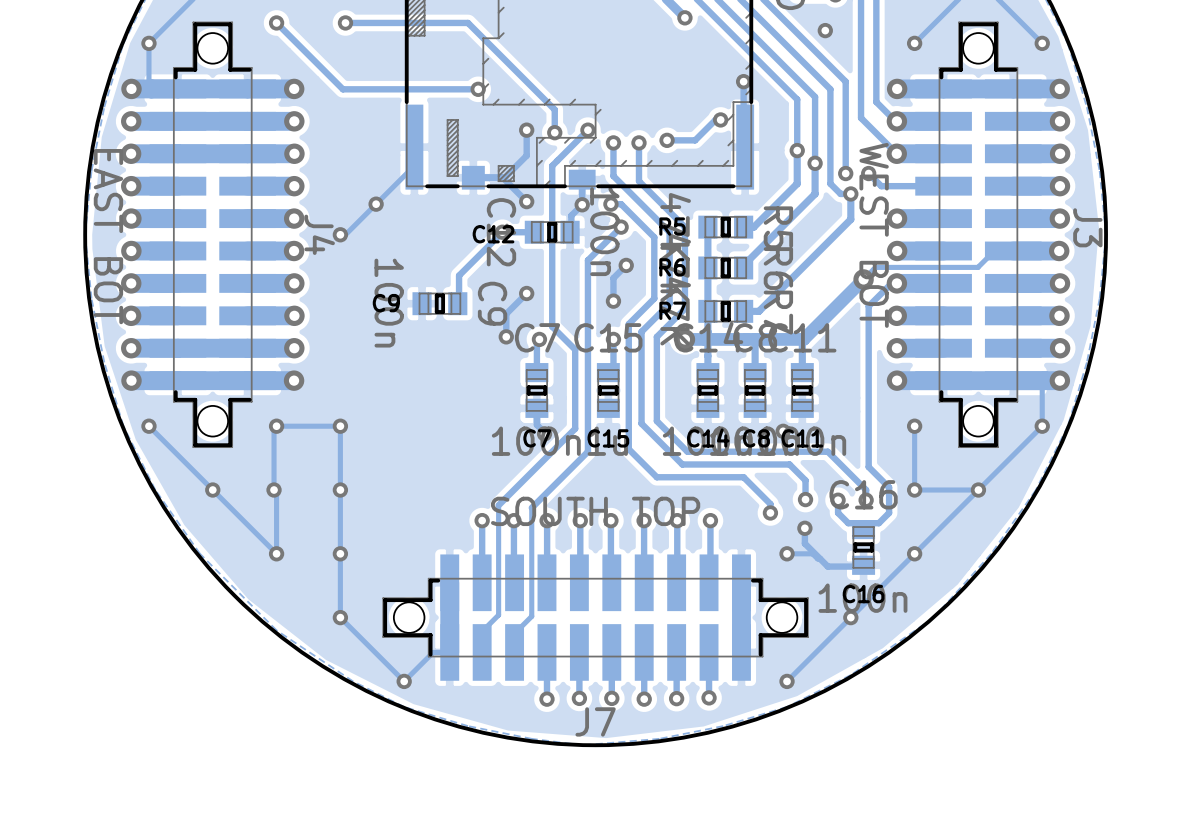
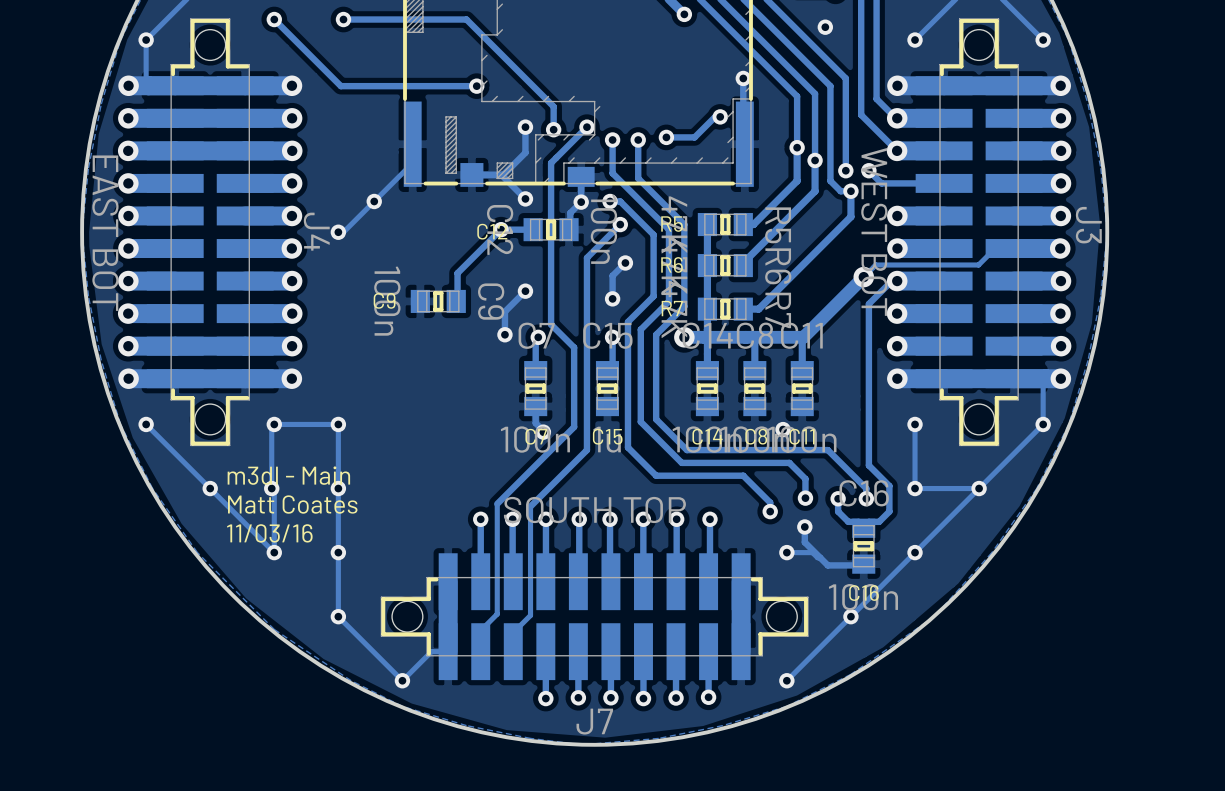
text: none -> m3dl - Main (288, 475)
text: none -> Matt Coates (292, 504)
text: none -> 11/03/16 (269, 533)

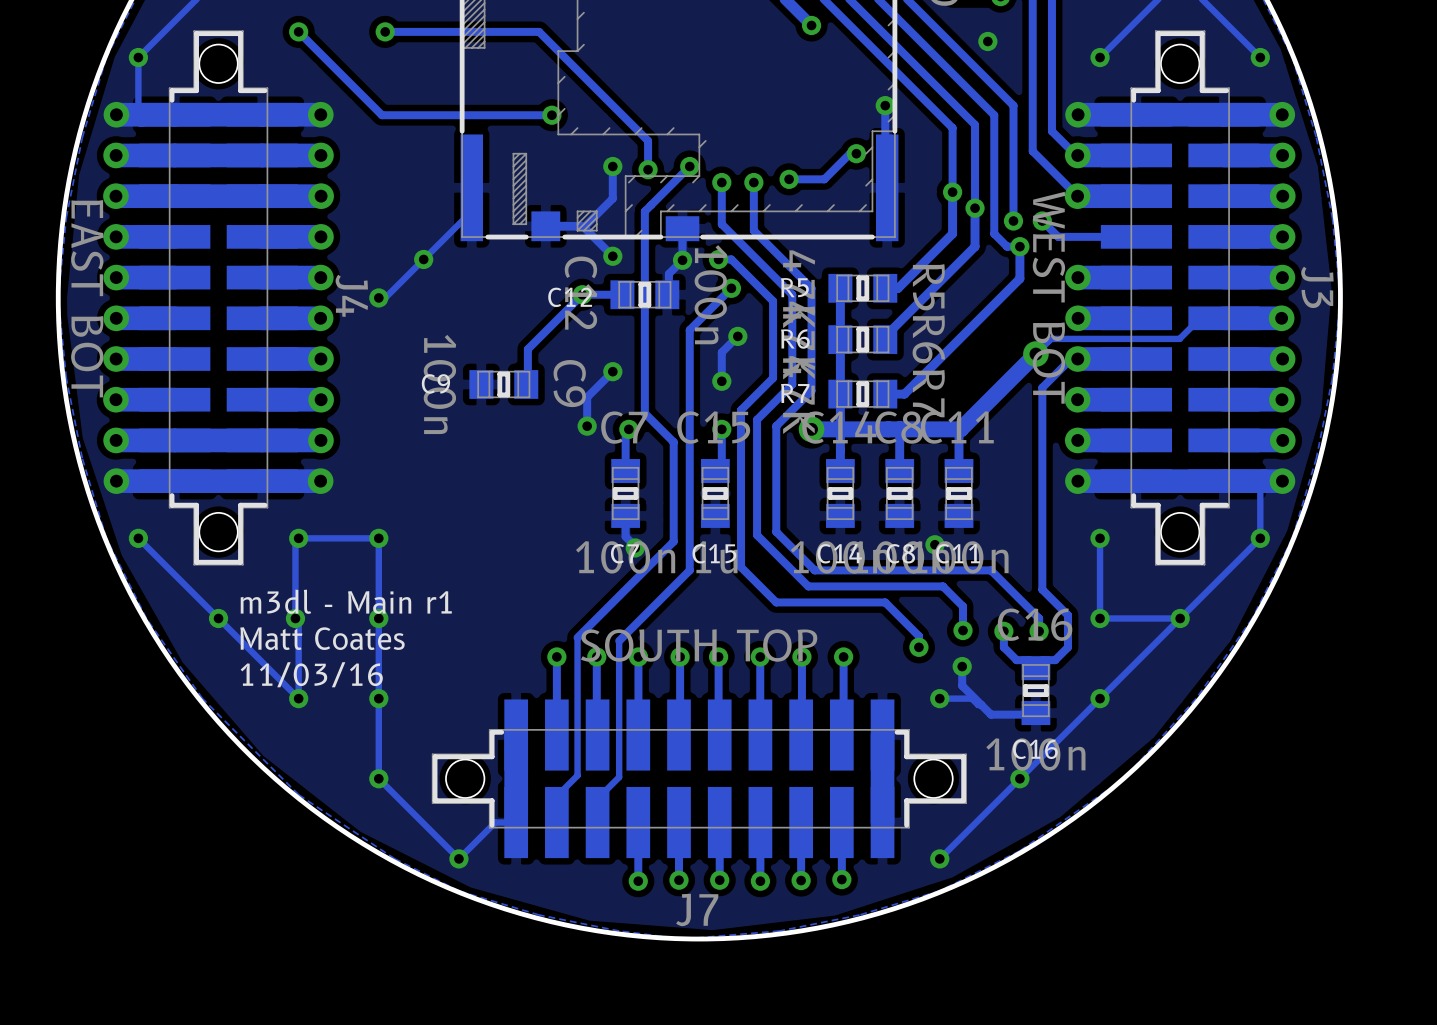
text: m3dl - Main (288, 475) -> m3dl - Main r1 (346, 601)

